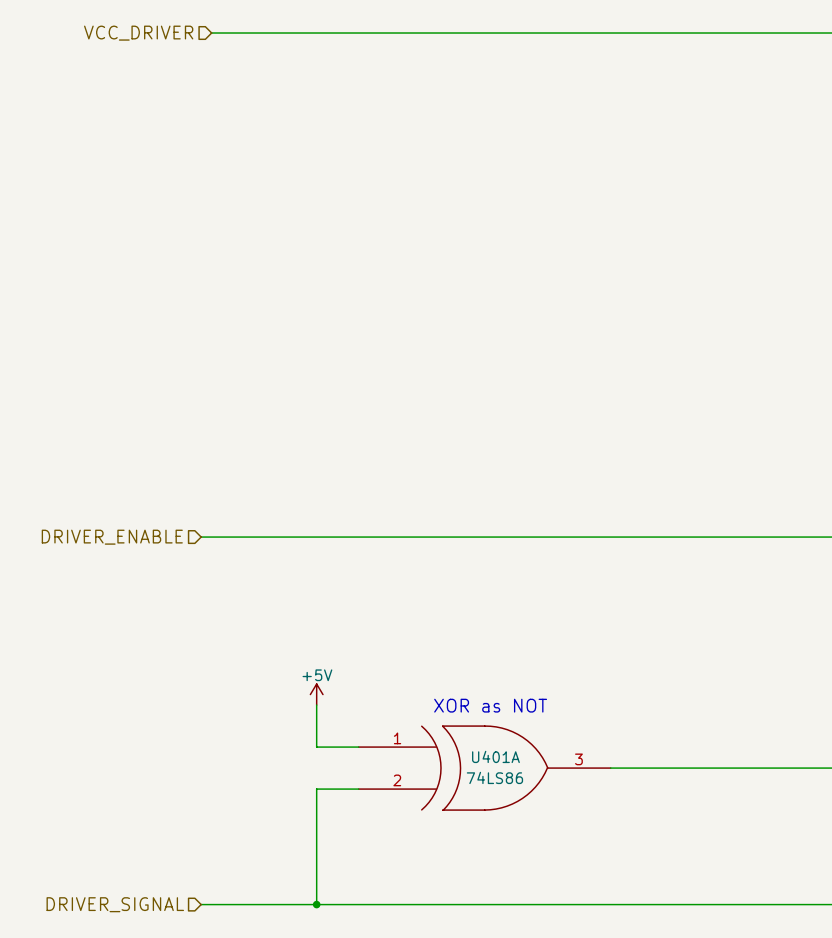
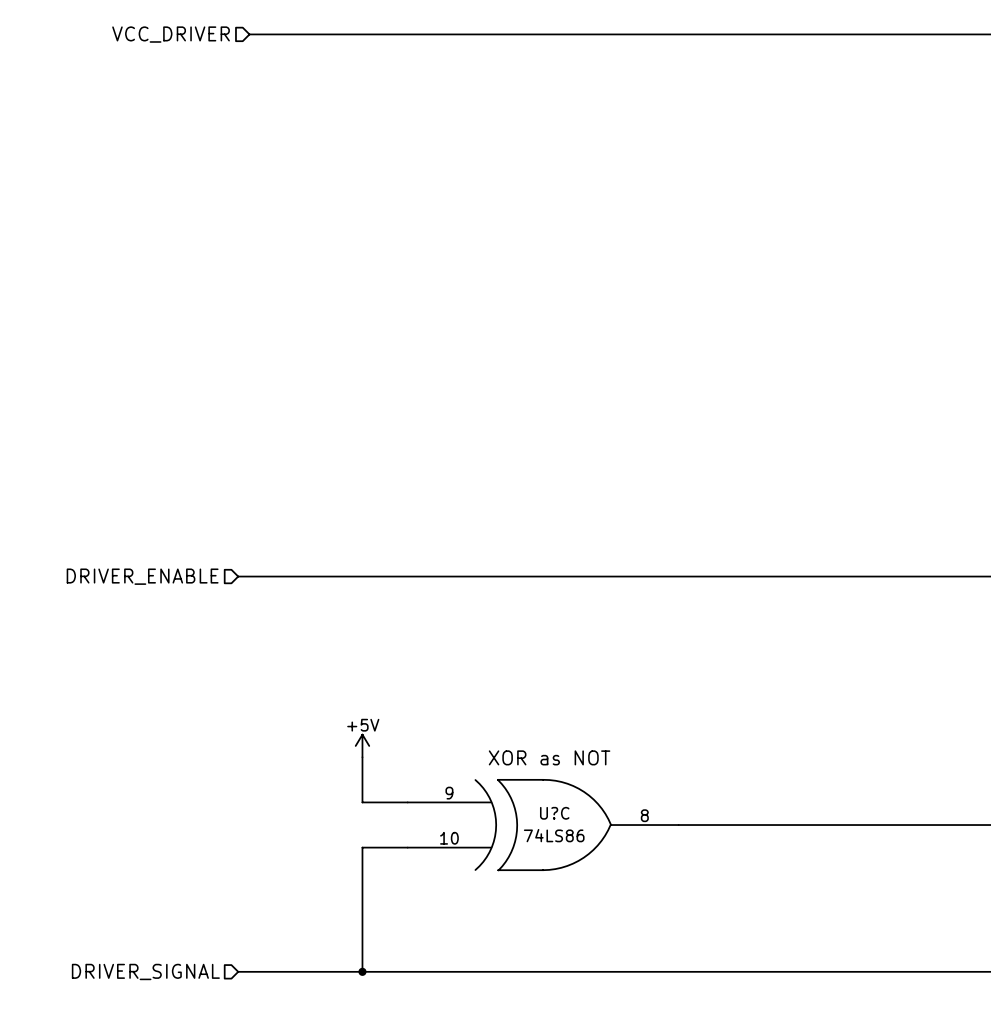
U401A pin number: 1 (397, 738) -> 9 (449, 793)
U401A name: U401A (495, 756) -> U?C (554, 813)
U401A pin number: 3 (578, 759) -> 8 (644, 815)
U401A pin number: 2 (397, 780) -> 10 (449, 838)

